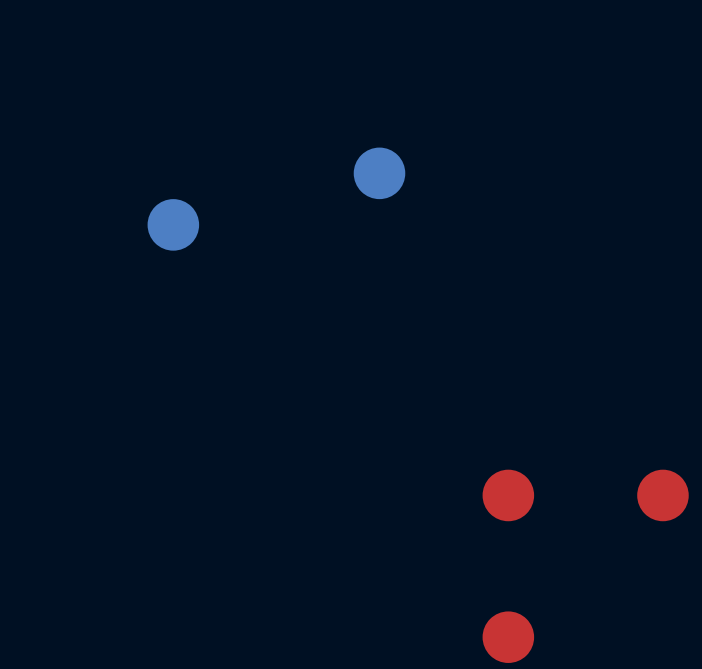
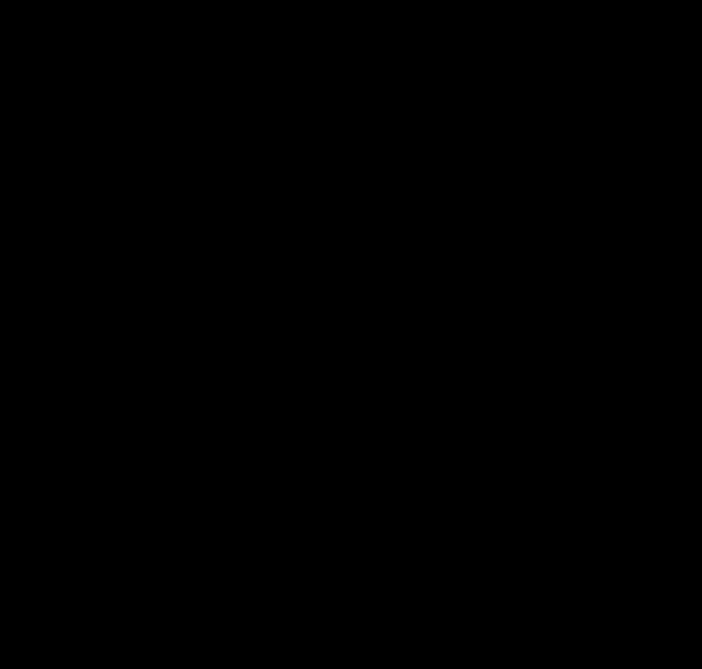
part: (379, 173) -> none
part: (173, 224) -> none
part: (508, 495) -> none
part: (662, 495) -> none
part: (508, 637) -> none

